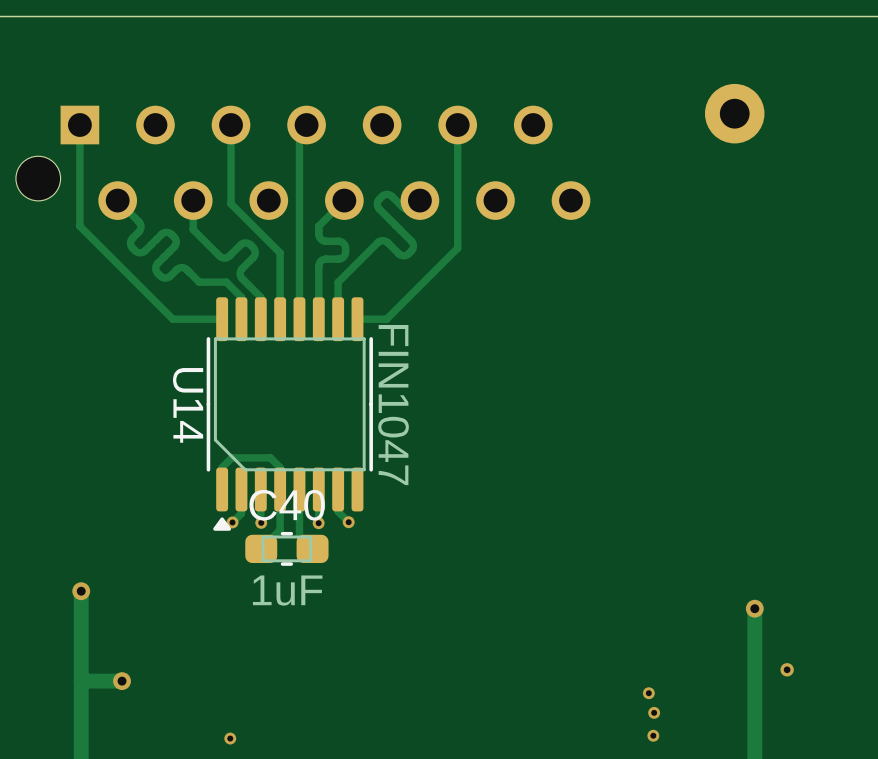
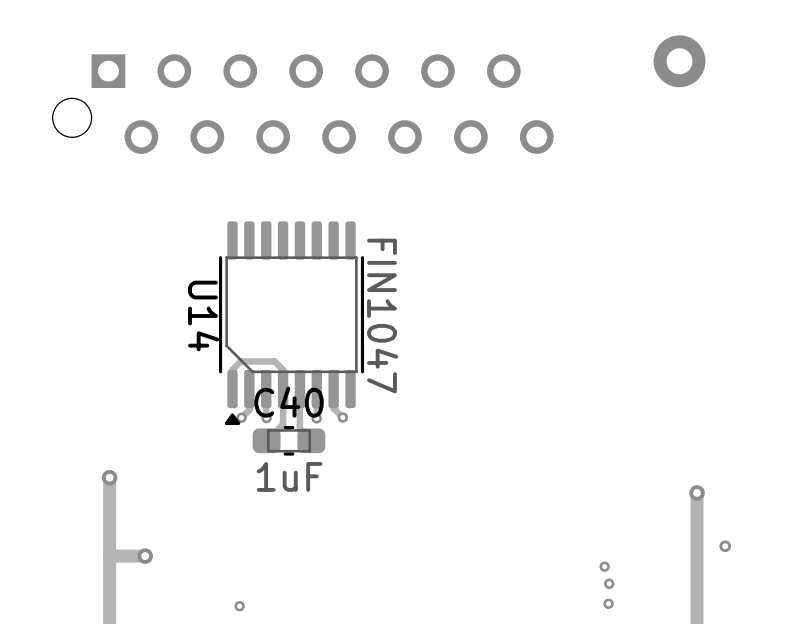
track: (79, 125) (79, 226) (172, 319) (222, 319) -> none
track: (231, 125) (231, 203) (280, 252) (280, 319) -> none
track: (306, 125) (299, 132) (299, 319) -> none
track: (457, 125) (457, 248) (386, 319) (357, 319) -> none
track: (117, 200) (140, 224) (139, 230) (130, 242) (131, 246) (136, 251) (144, 251) (164, 232) (170, 233) (175, 238) (174, 246) (156, 266) (156, 271) (160, 275) (168, 277) (177, 269) (182, 267) (199, 282) (226, 282) (241, 297) (241, 319) -> none
track: (193, 200) (193, 229) (220, 256) (228, 256) (244, 243) (249, 244) (254, 248) (254, 255) (241, 269) (240, 274) (260, 297) (260, 319) -> none
track: (344, 200) (318, 226) (318, 235) (321, 239) (340, 241) (345, 248) (345, 254) (342, 258) (324, 259) (319, 263) (318, 319) -> none
track: (419, 200) (408, 209) (403, 207) (389, 194) (383, 195) (378, 200) (378, 208) (411, 241) (413, 247) (408, 254) (402, 255) (385, 241) (377, 242) (338, 282) (338, 319) -> none

